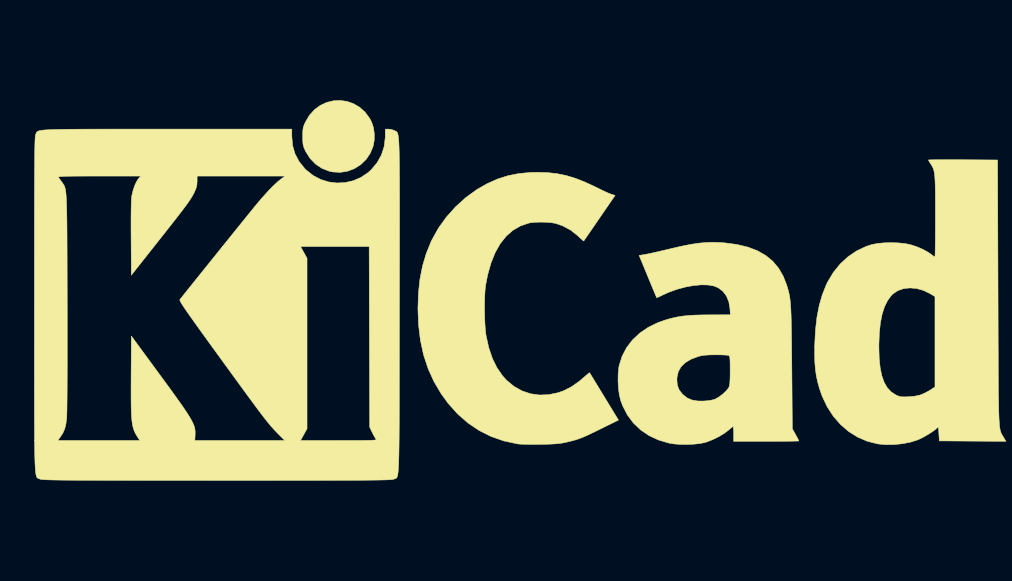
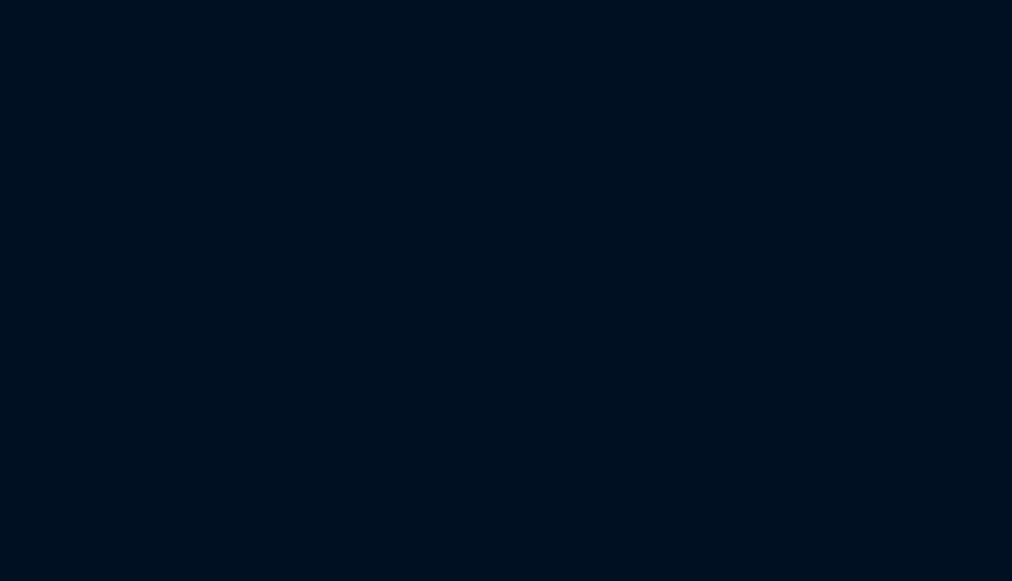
drawing: [34, 100, 1007, 481] -> none

